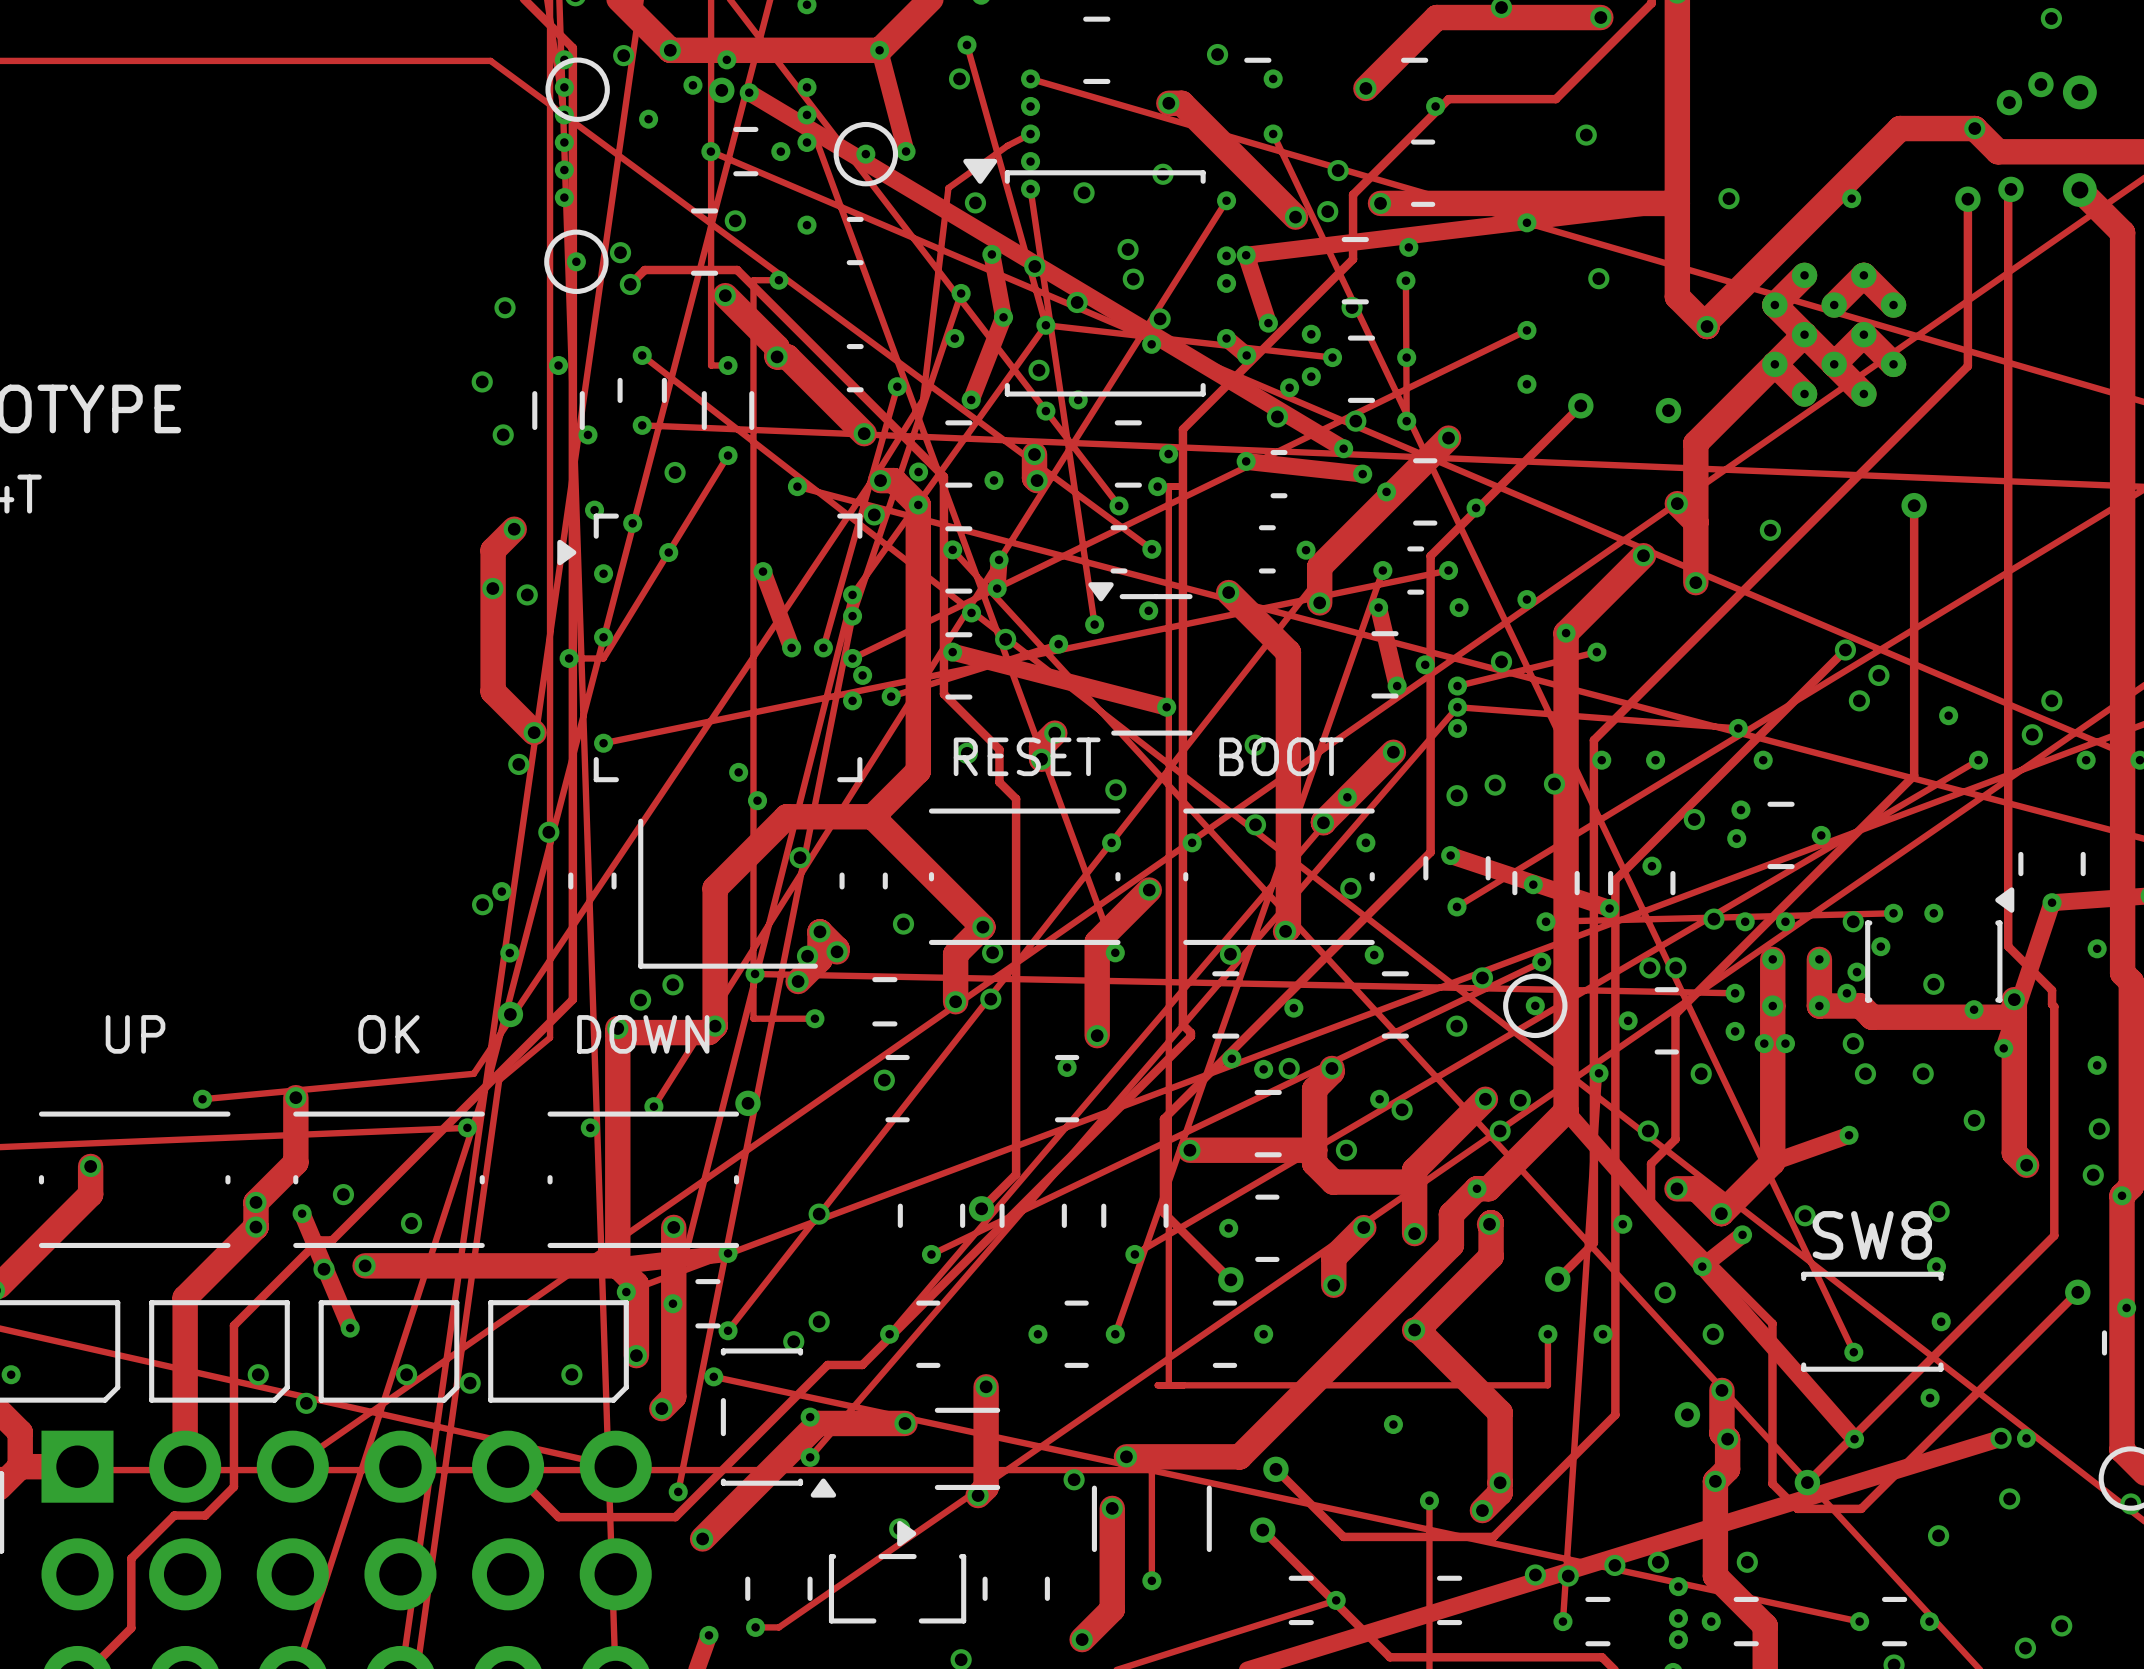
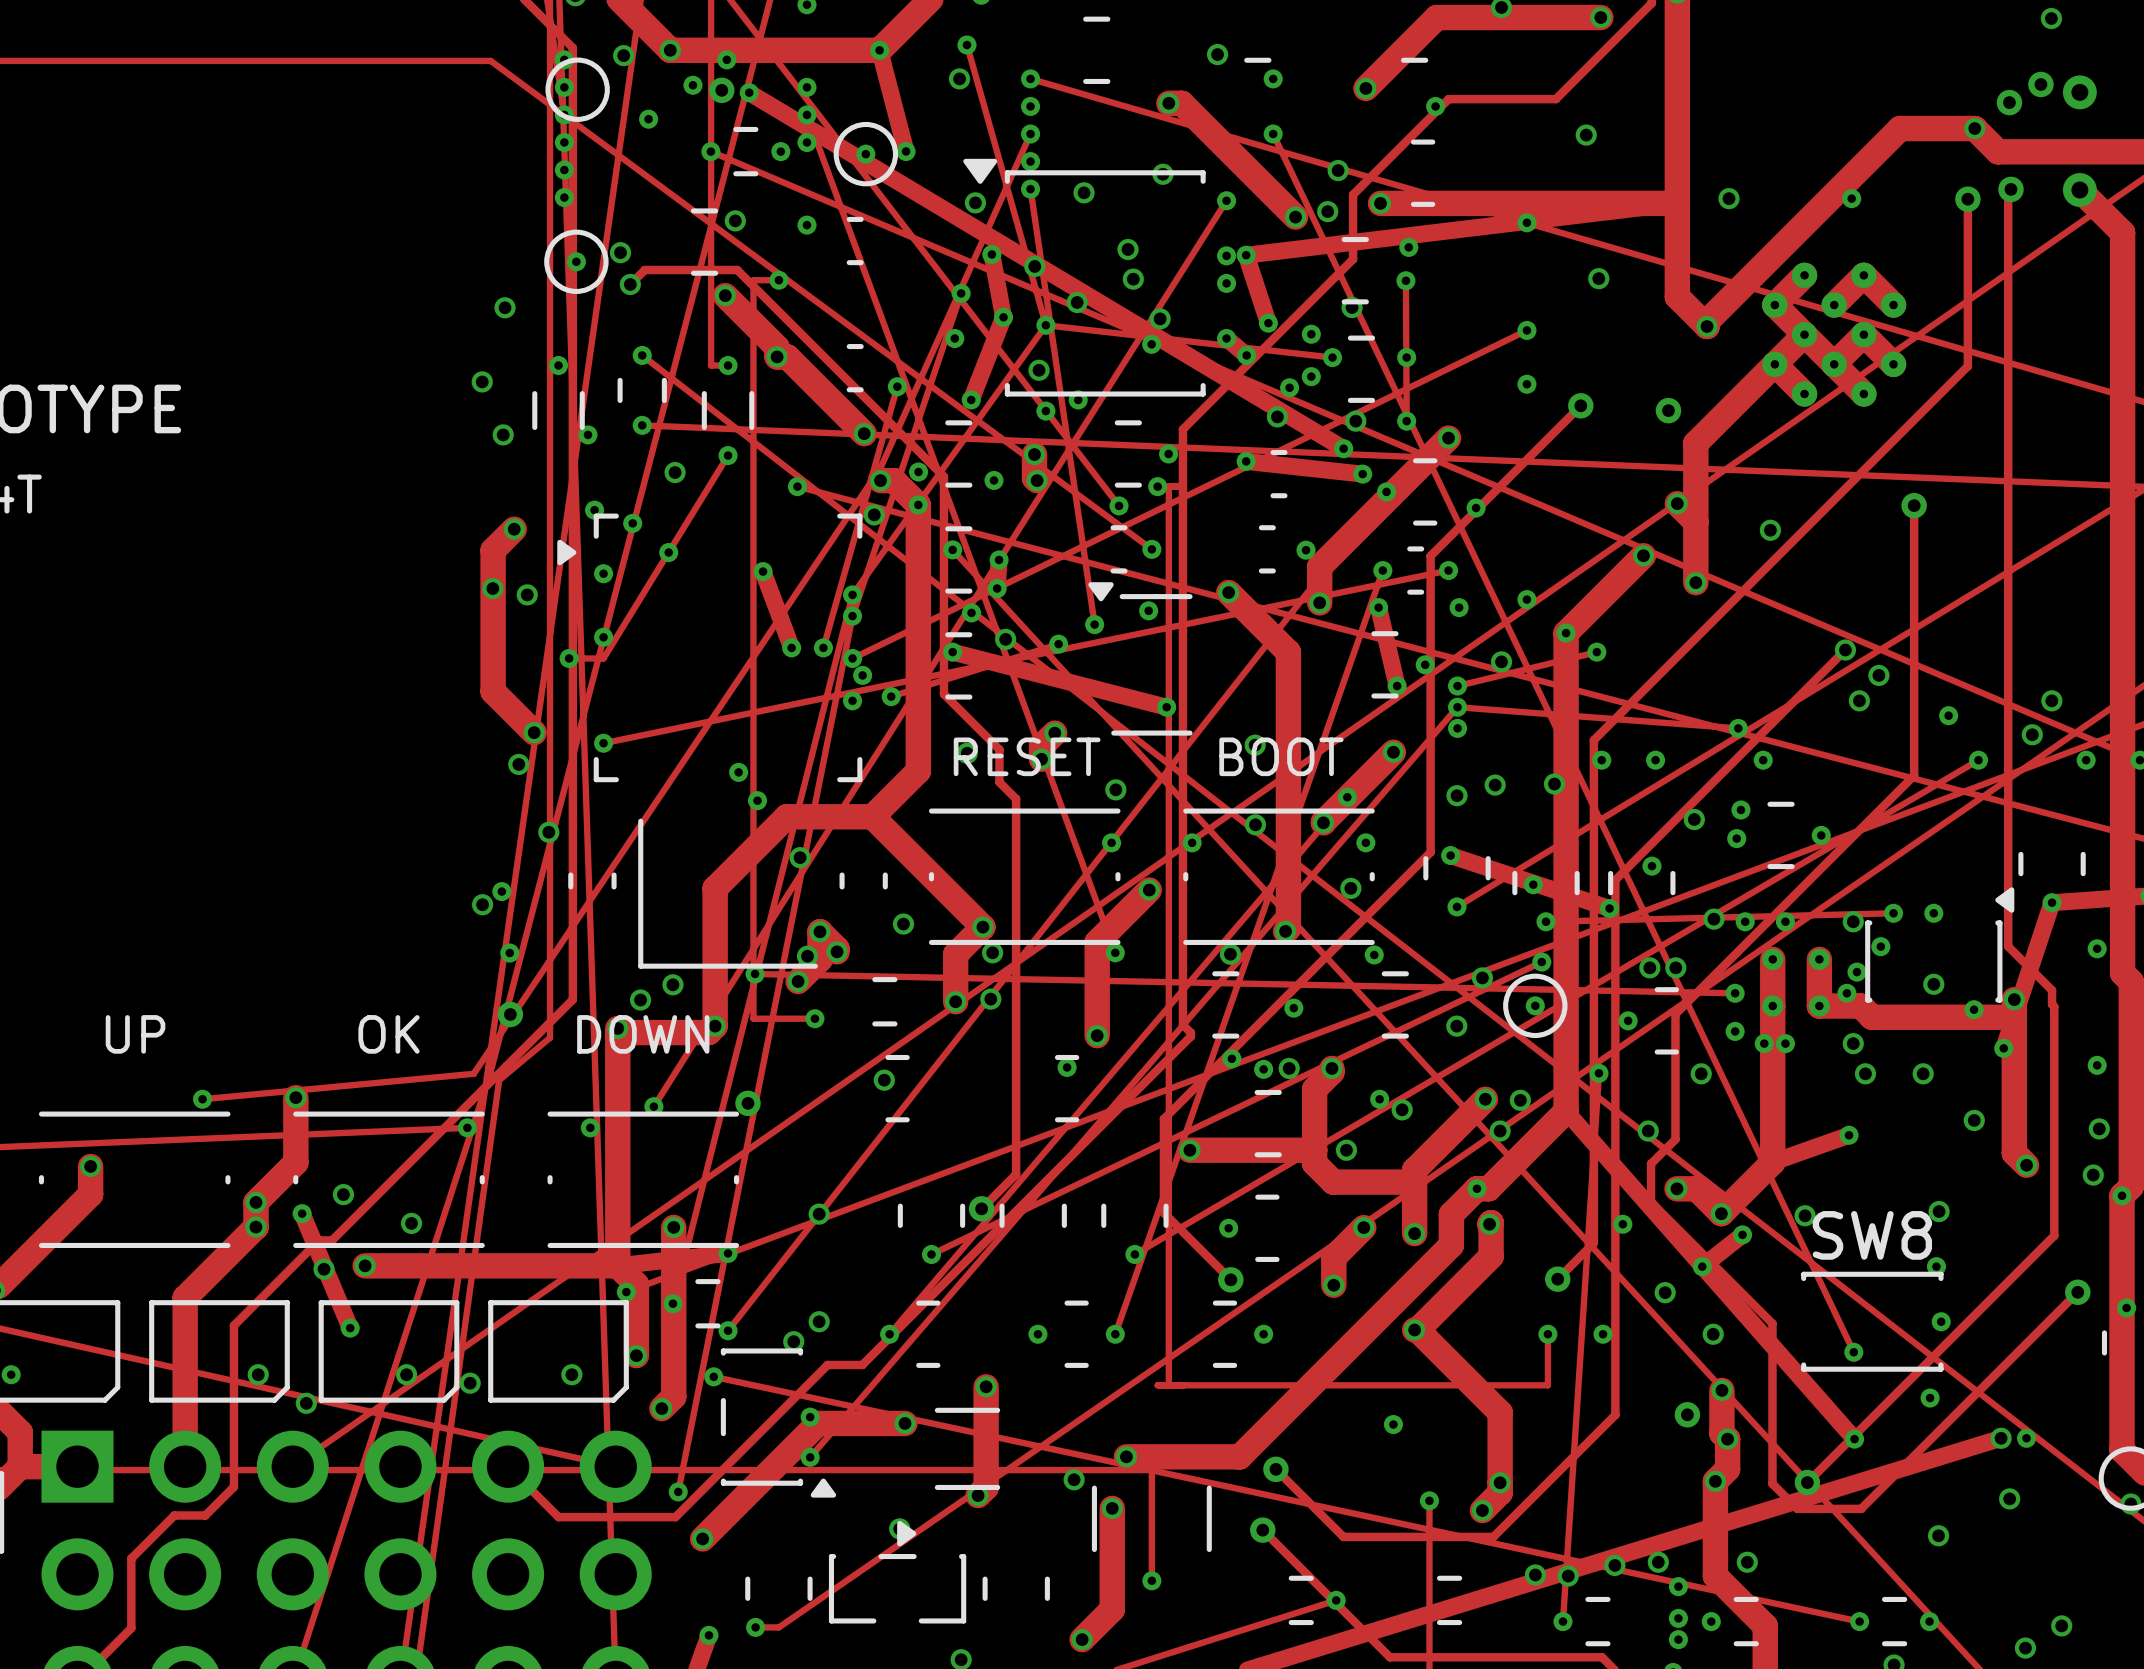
track: (1030, 134) (1007, 145) (948, 188) (923, 399) (880, 467) -> (1030, 134) (880, 467)

